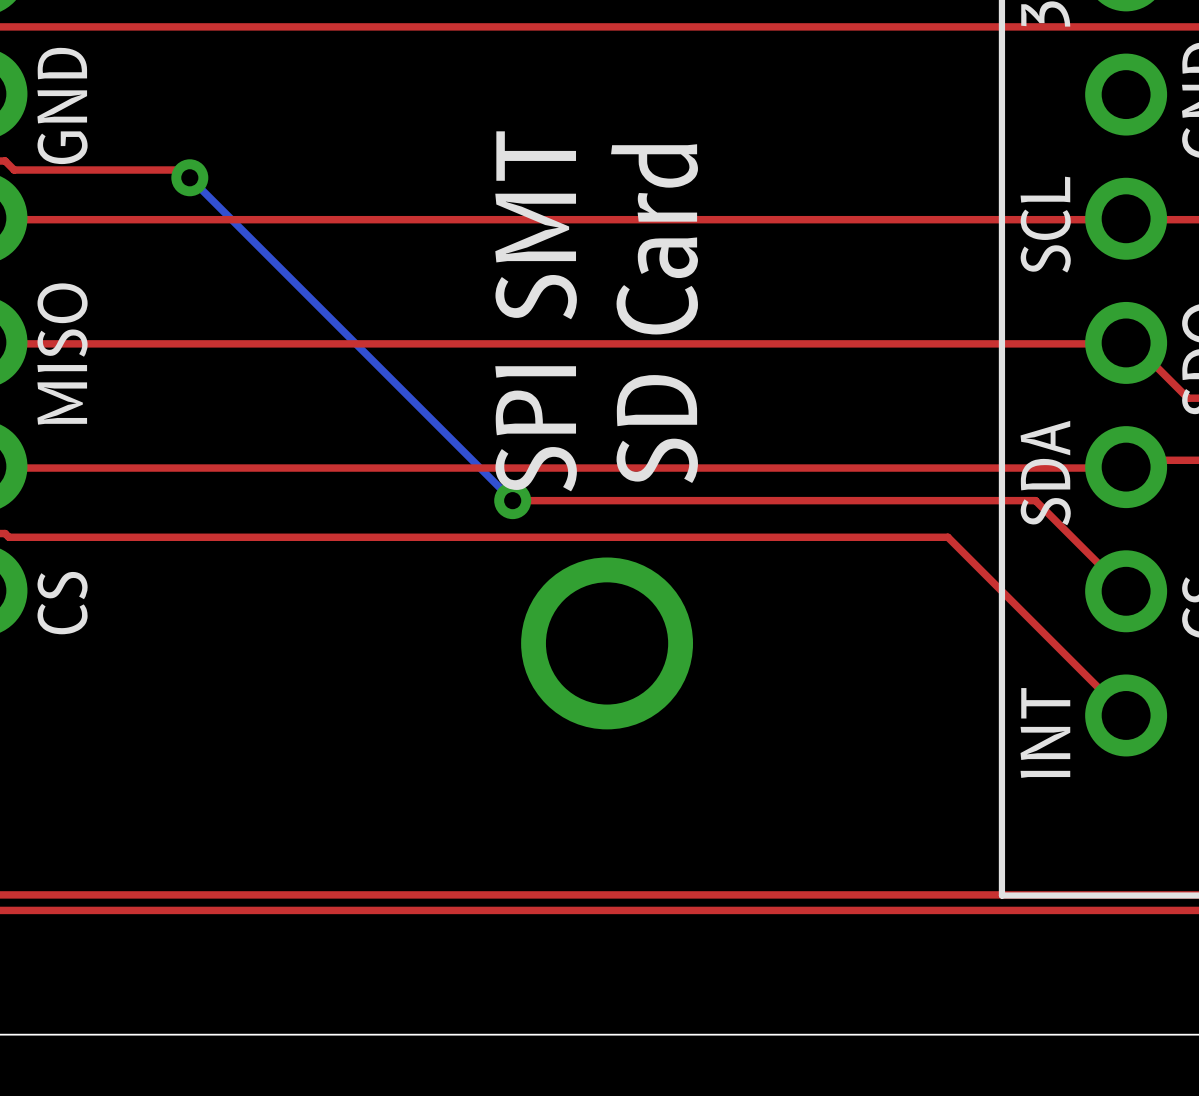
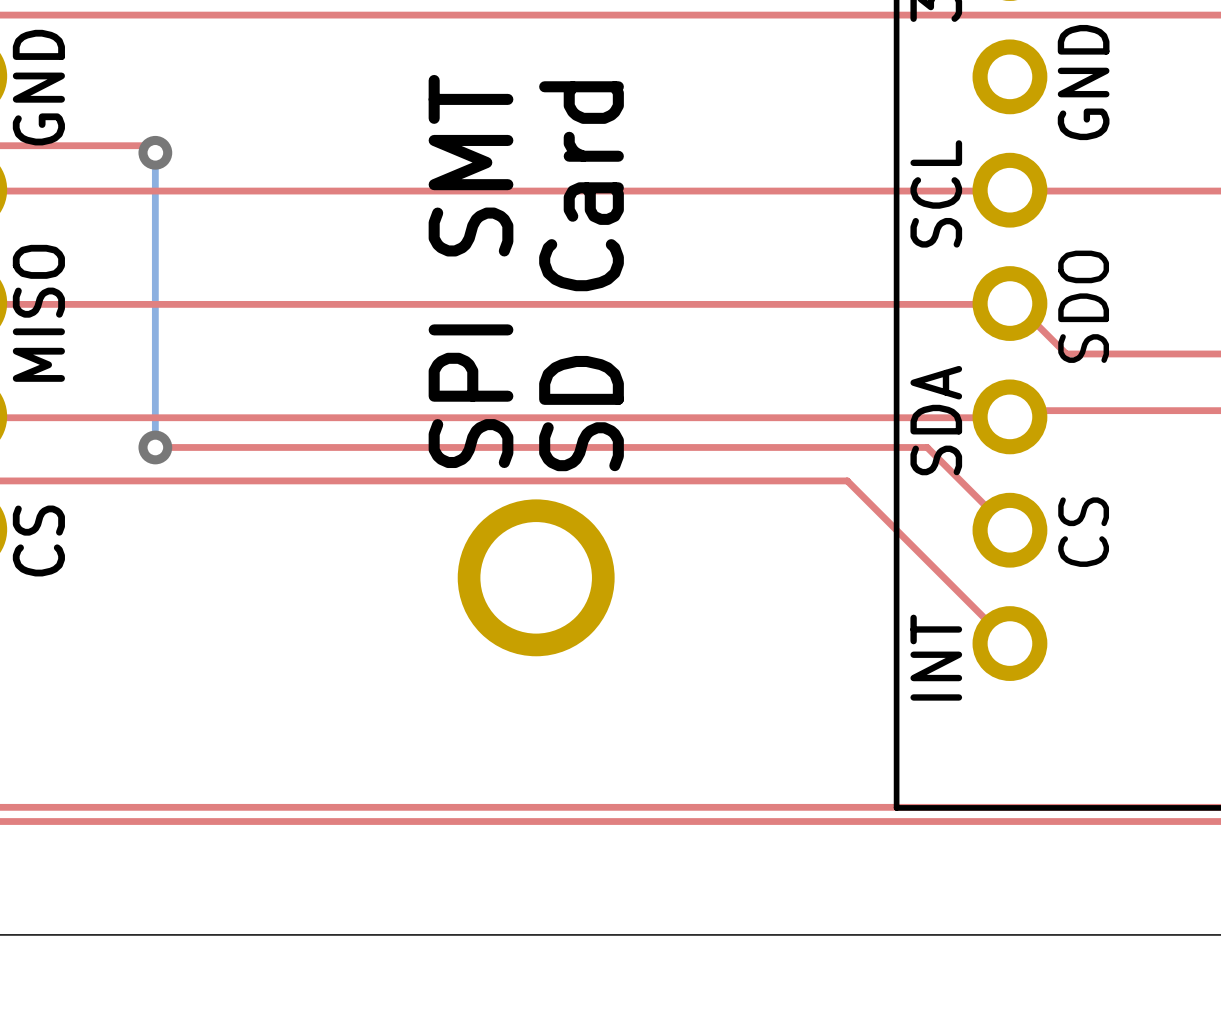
bottom track: (189, 177) (512, 500) -> (155, 152) (155, 447)
top track: none -> (155, 447) (450, 447)
via: none -> (155, 447)
via: (512, 500) -> none

